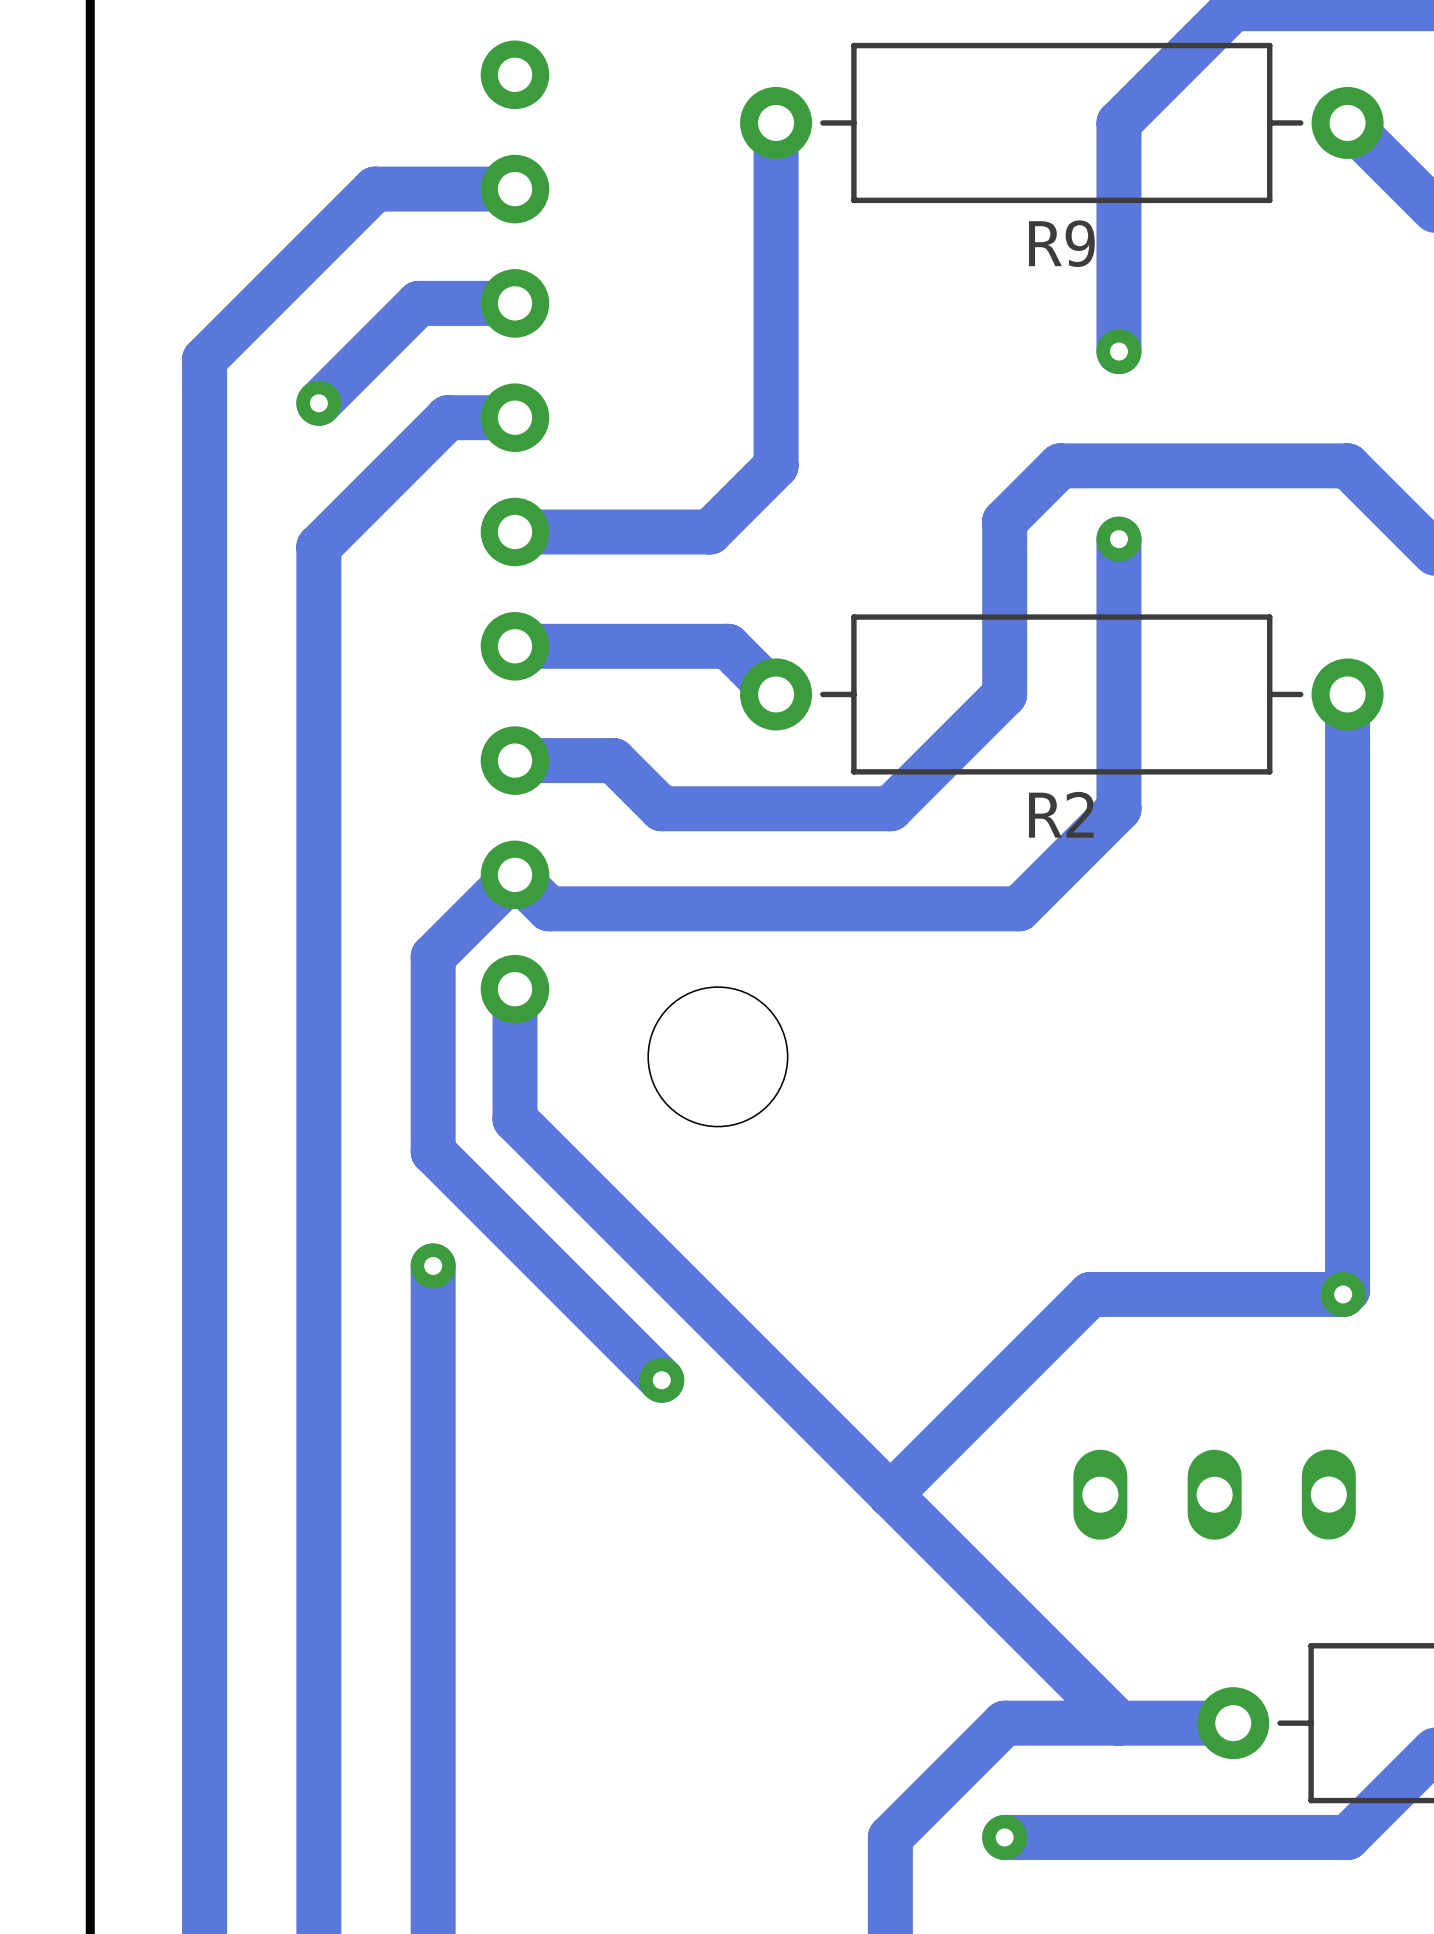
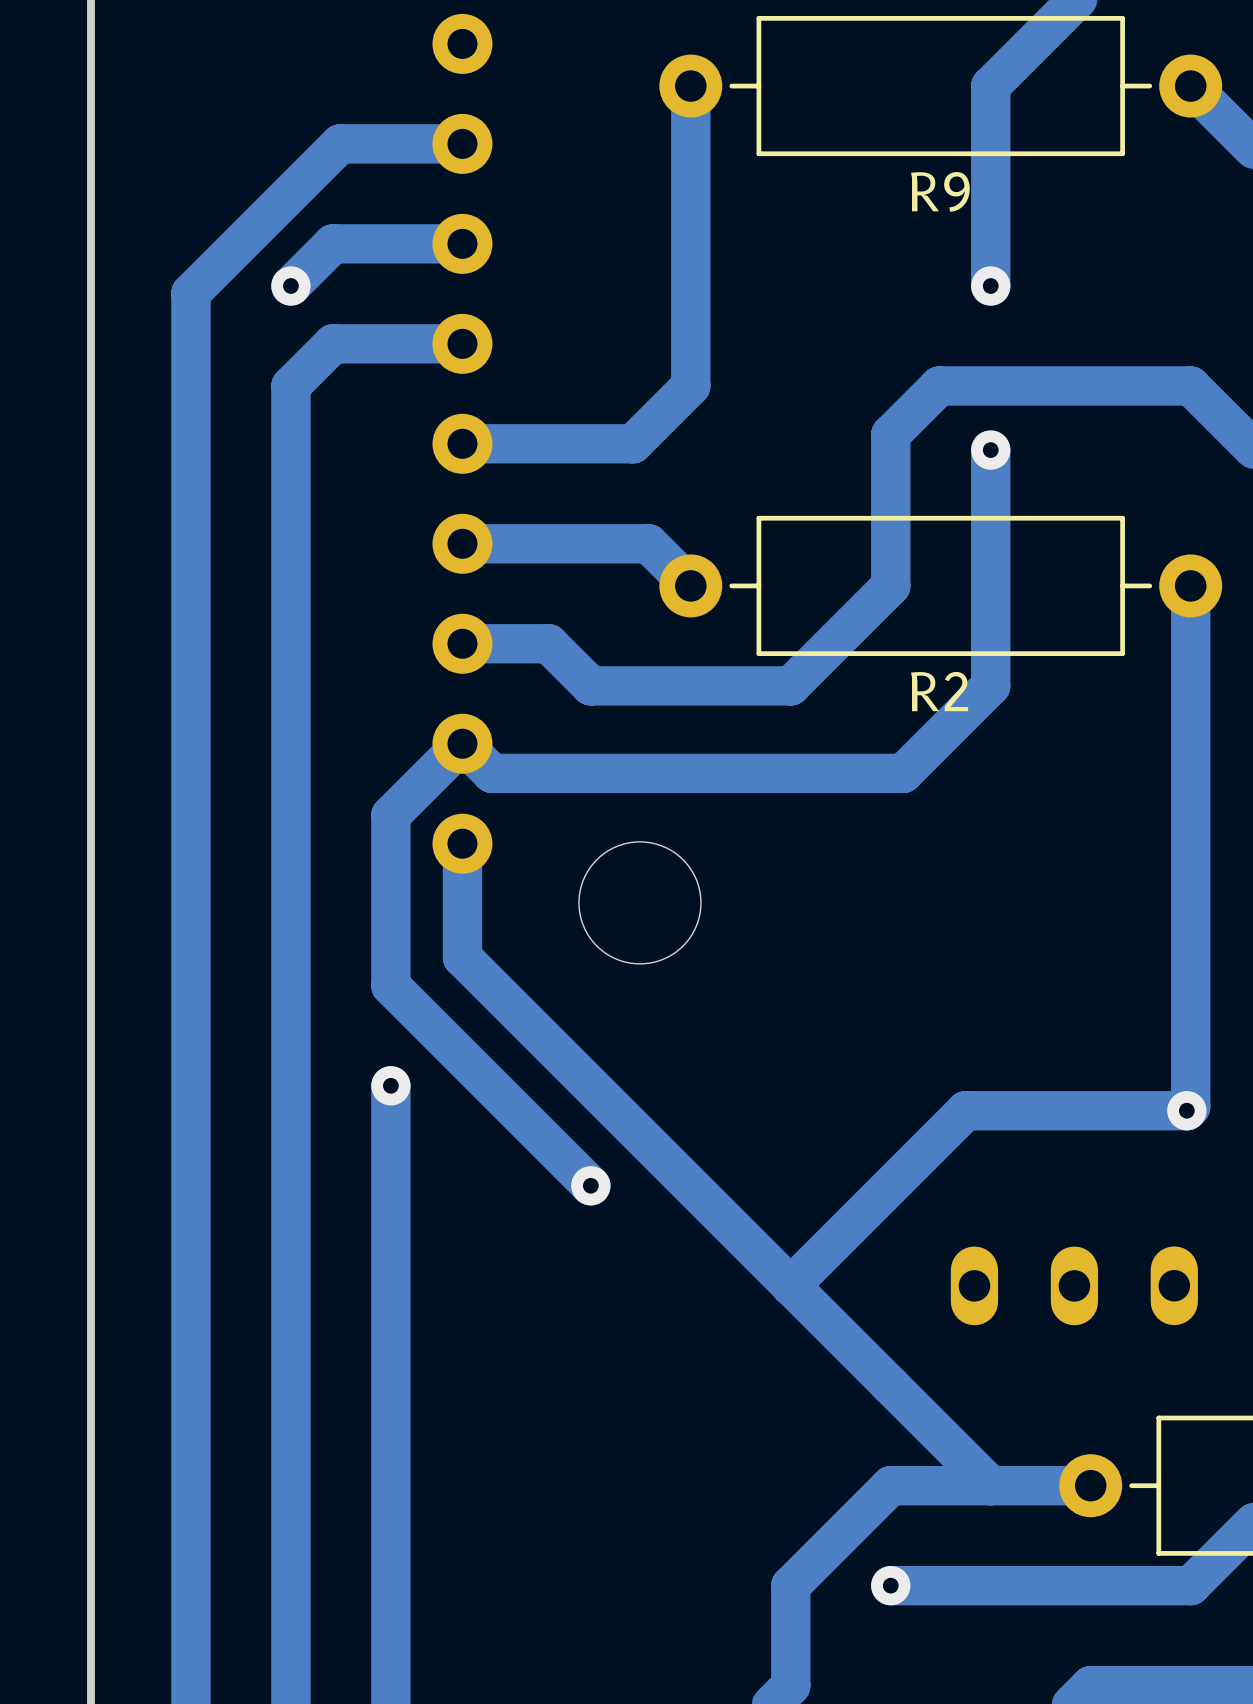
track: (418, 303) (318, 403) -> (378, 243) (333, 243) (290, 286)
via position: (318, 403) -> (290, 286)
track: (448, 417) (318, 546) -> (403, 343) (333, 343) (290, 385) (290, 456)

